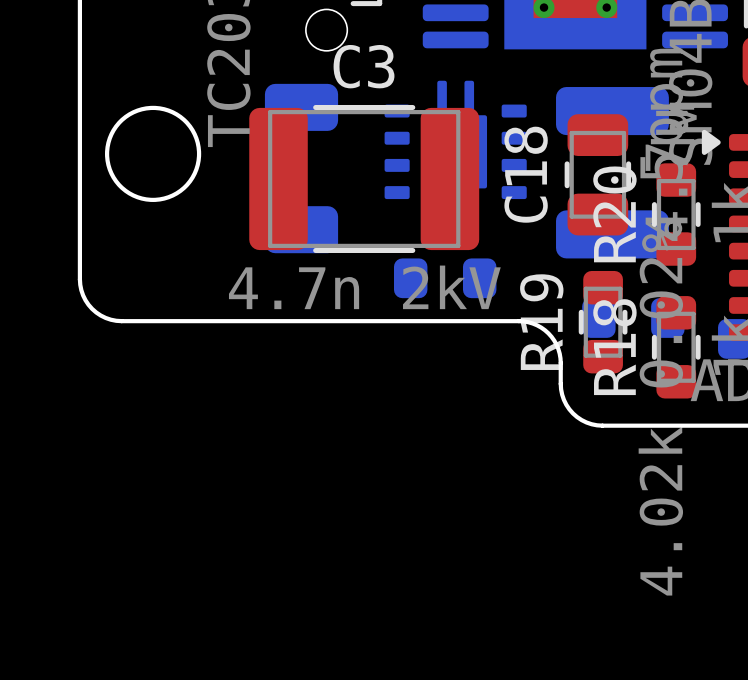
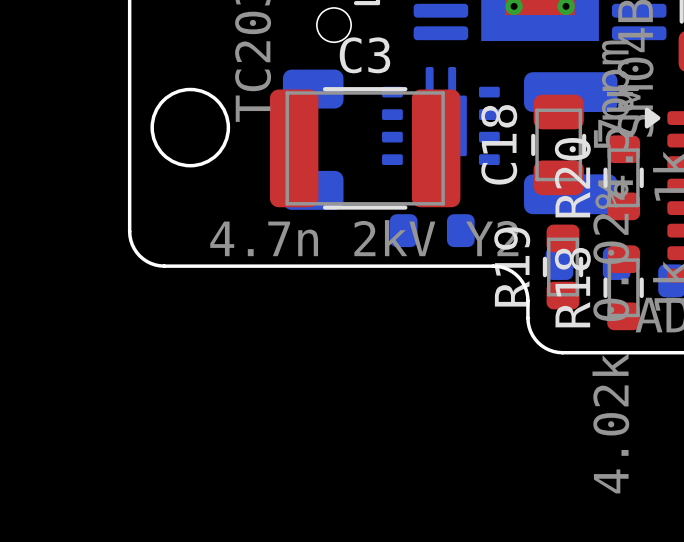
C3 value: 4.7n 2kV (364, 287) -> 4.7n 2kV Y2 (364, 238)

